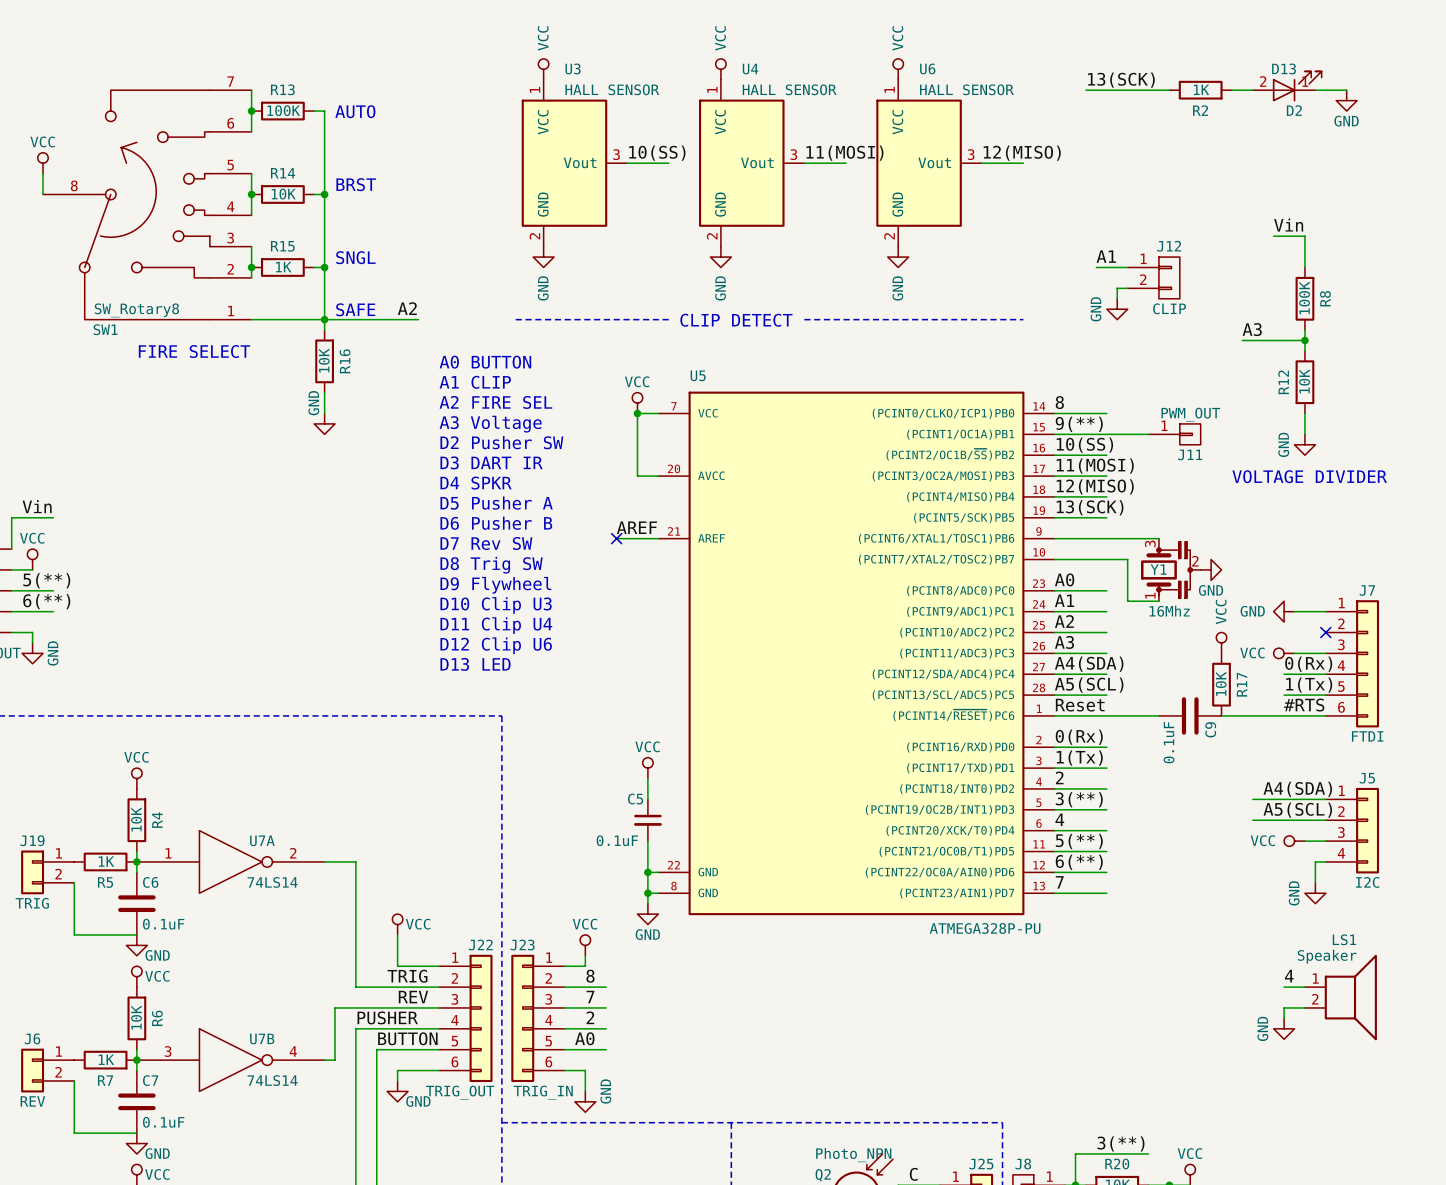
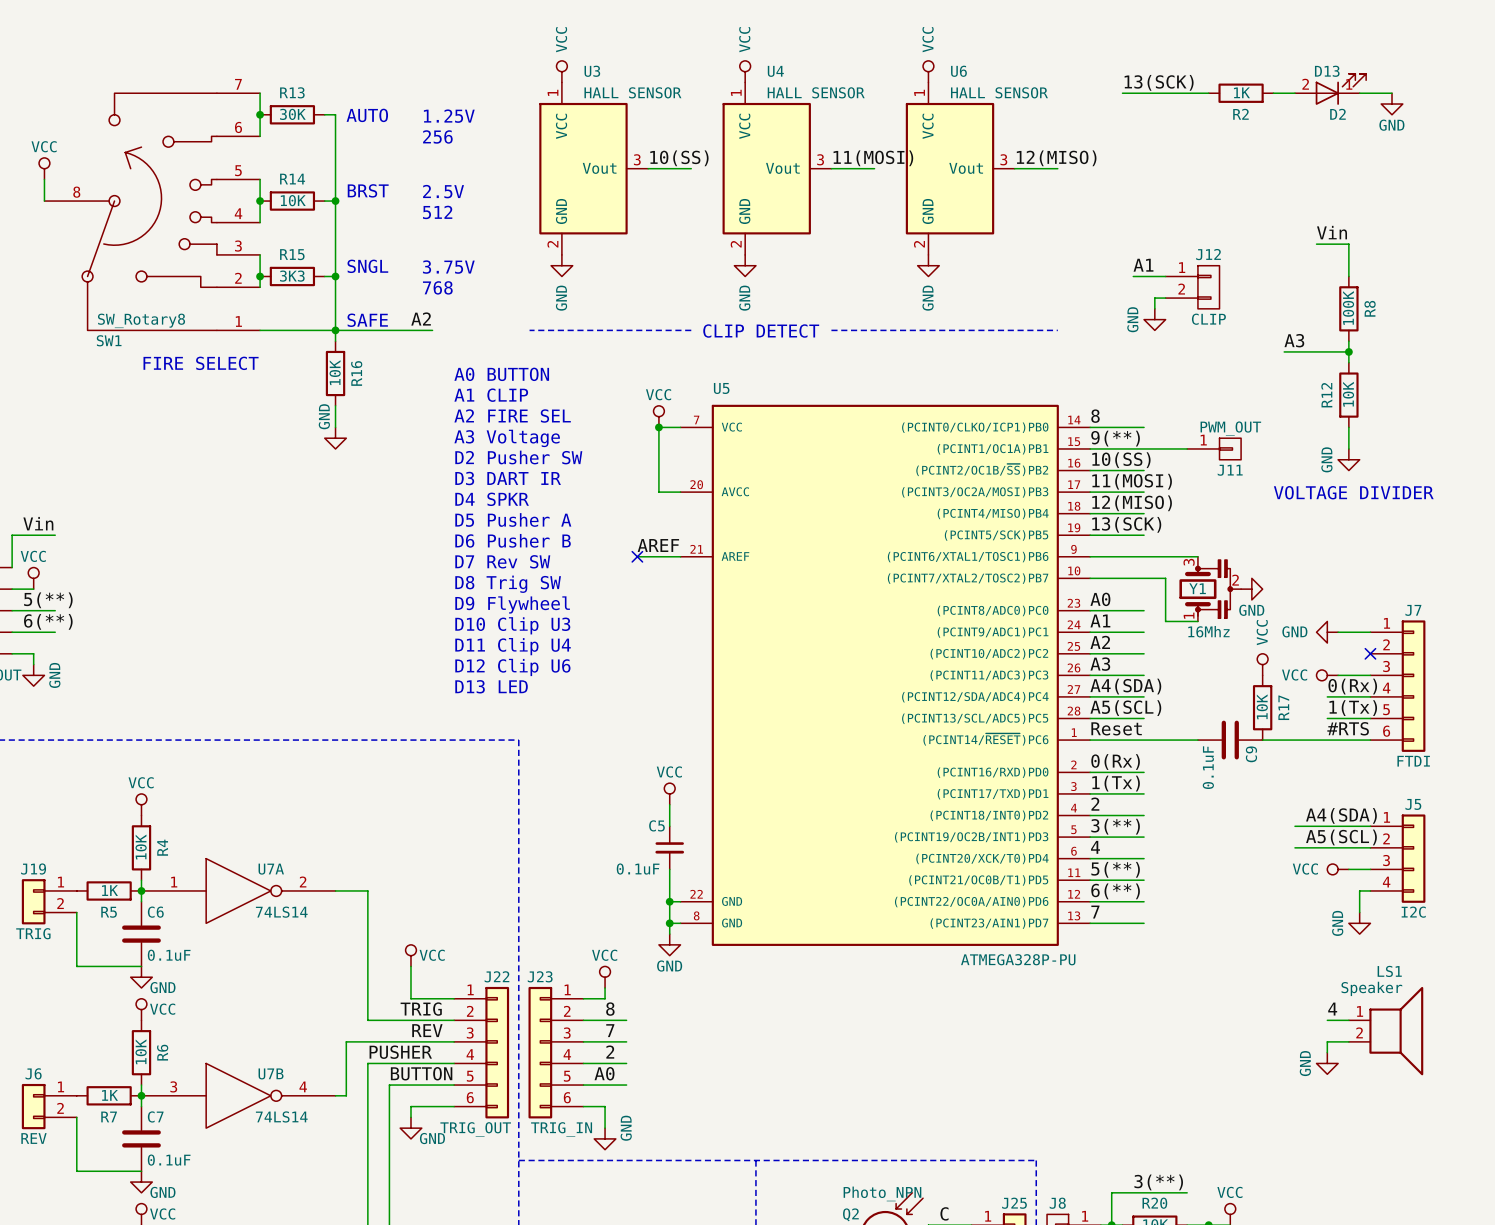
R13 value: 100K (283, 110) -> 30K (292, 114)
text: none -> 1.25V (449, 116)
text: none -> 256 (437, 136)
text: none -> 2.5V (443, 191)
text: none -> 512 (437, 212)
text: none -> 3.75V (448, 267)
R15 value: 1K (283, 267) -> 3K3 (292, 276)
text: none -> 768 (437, 287)

